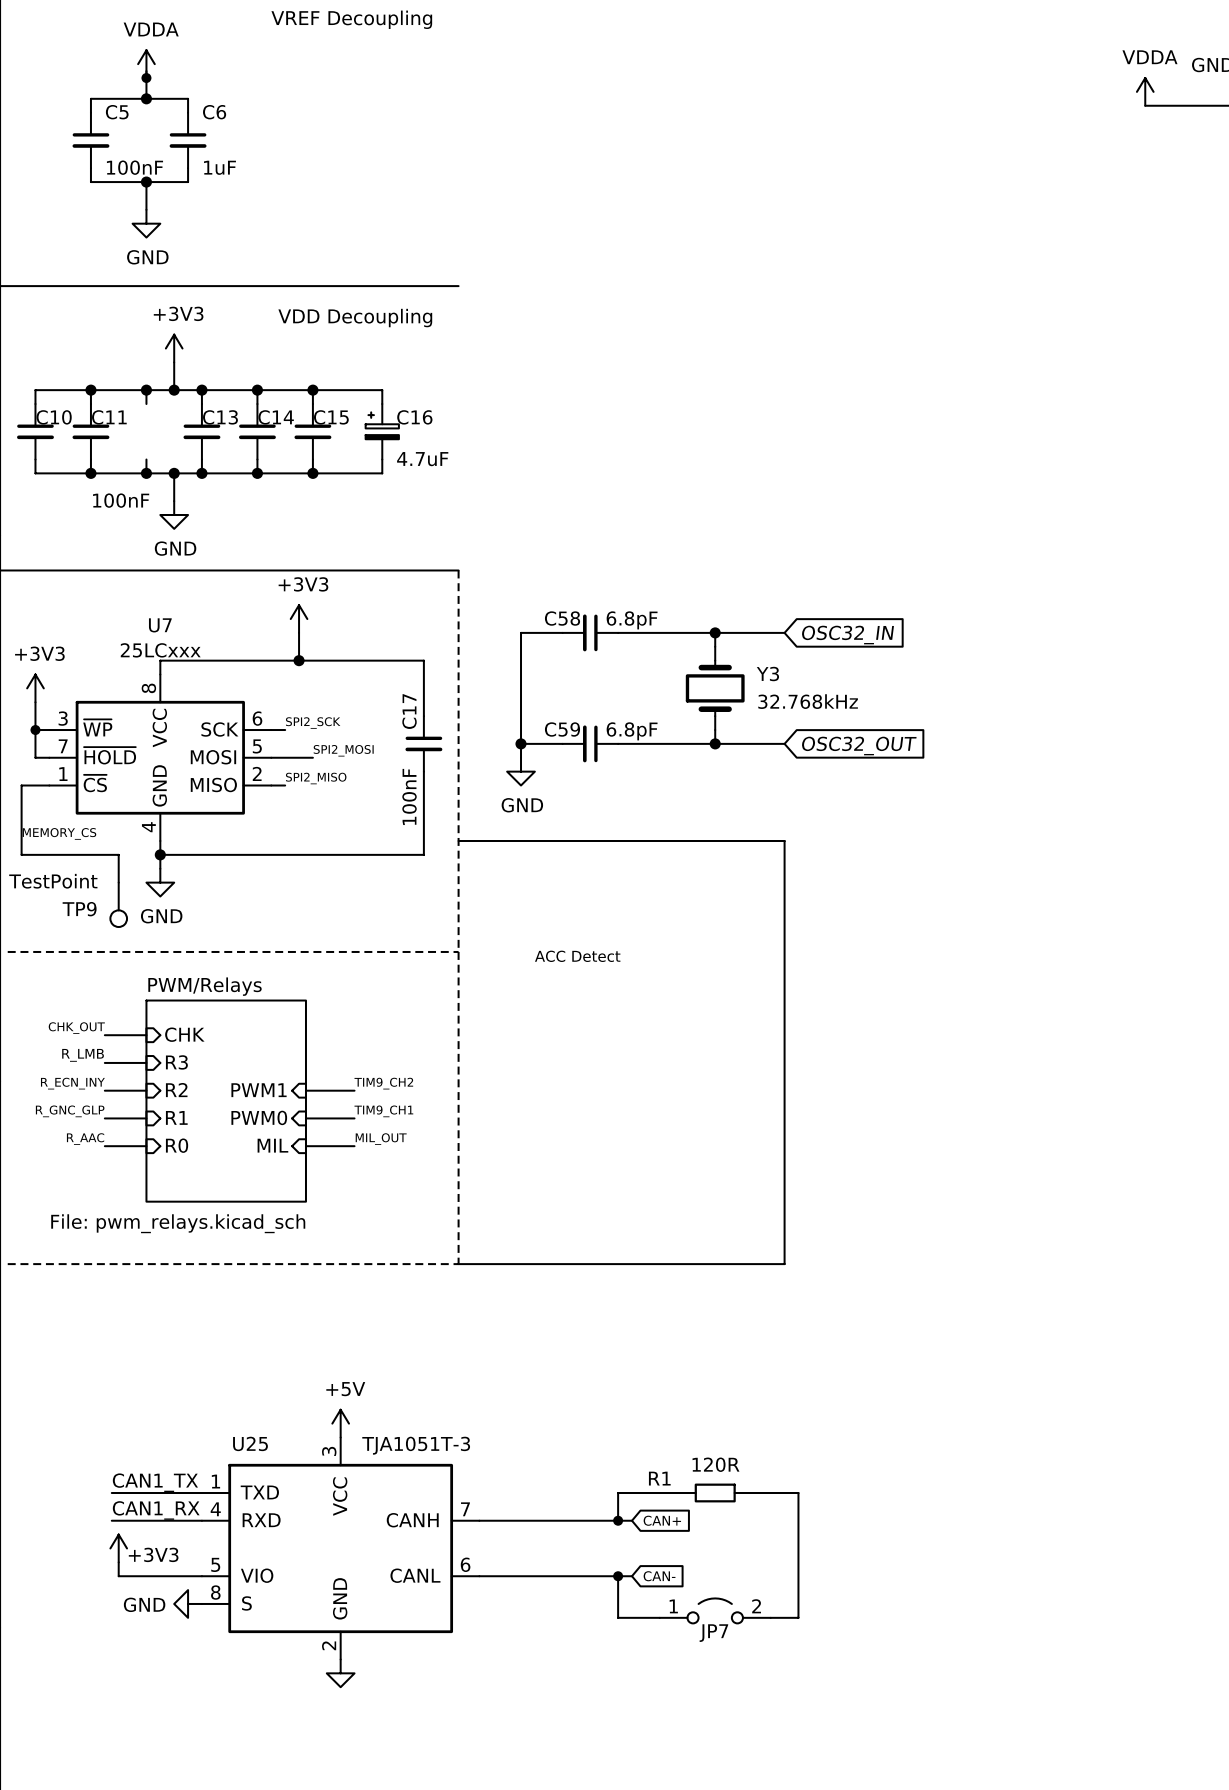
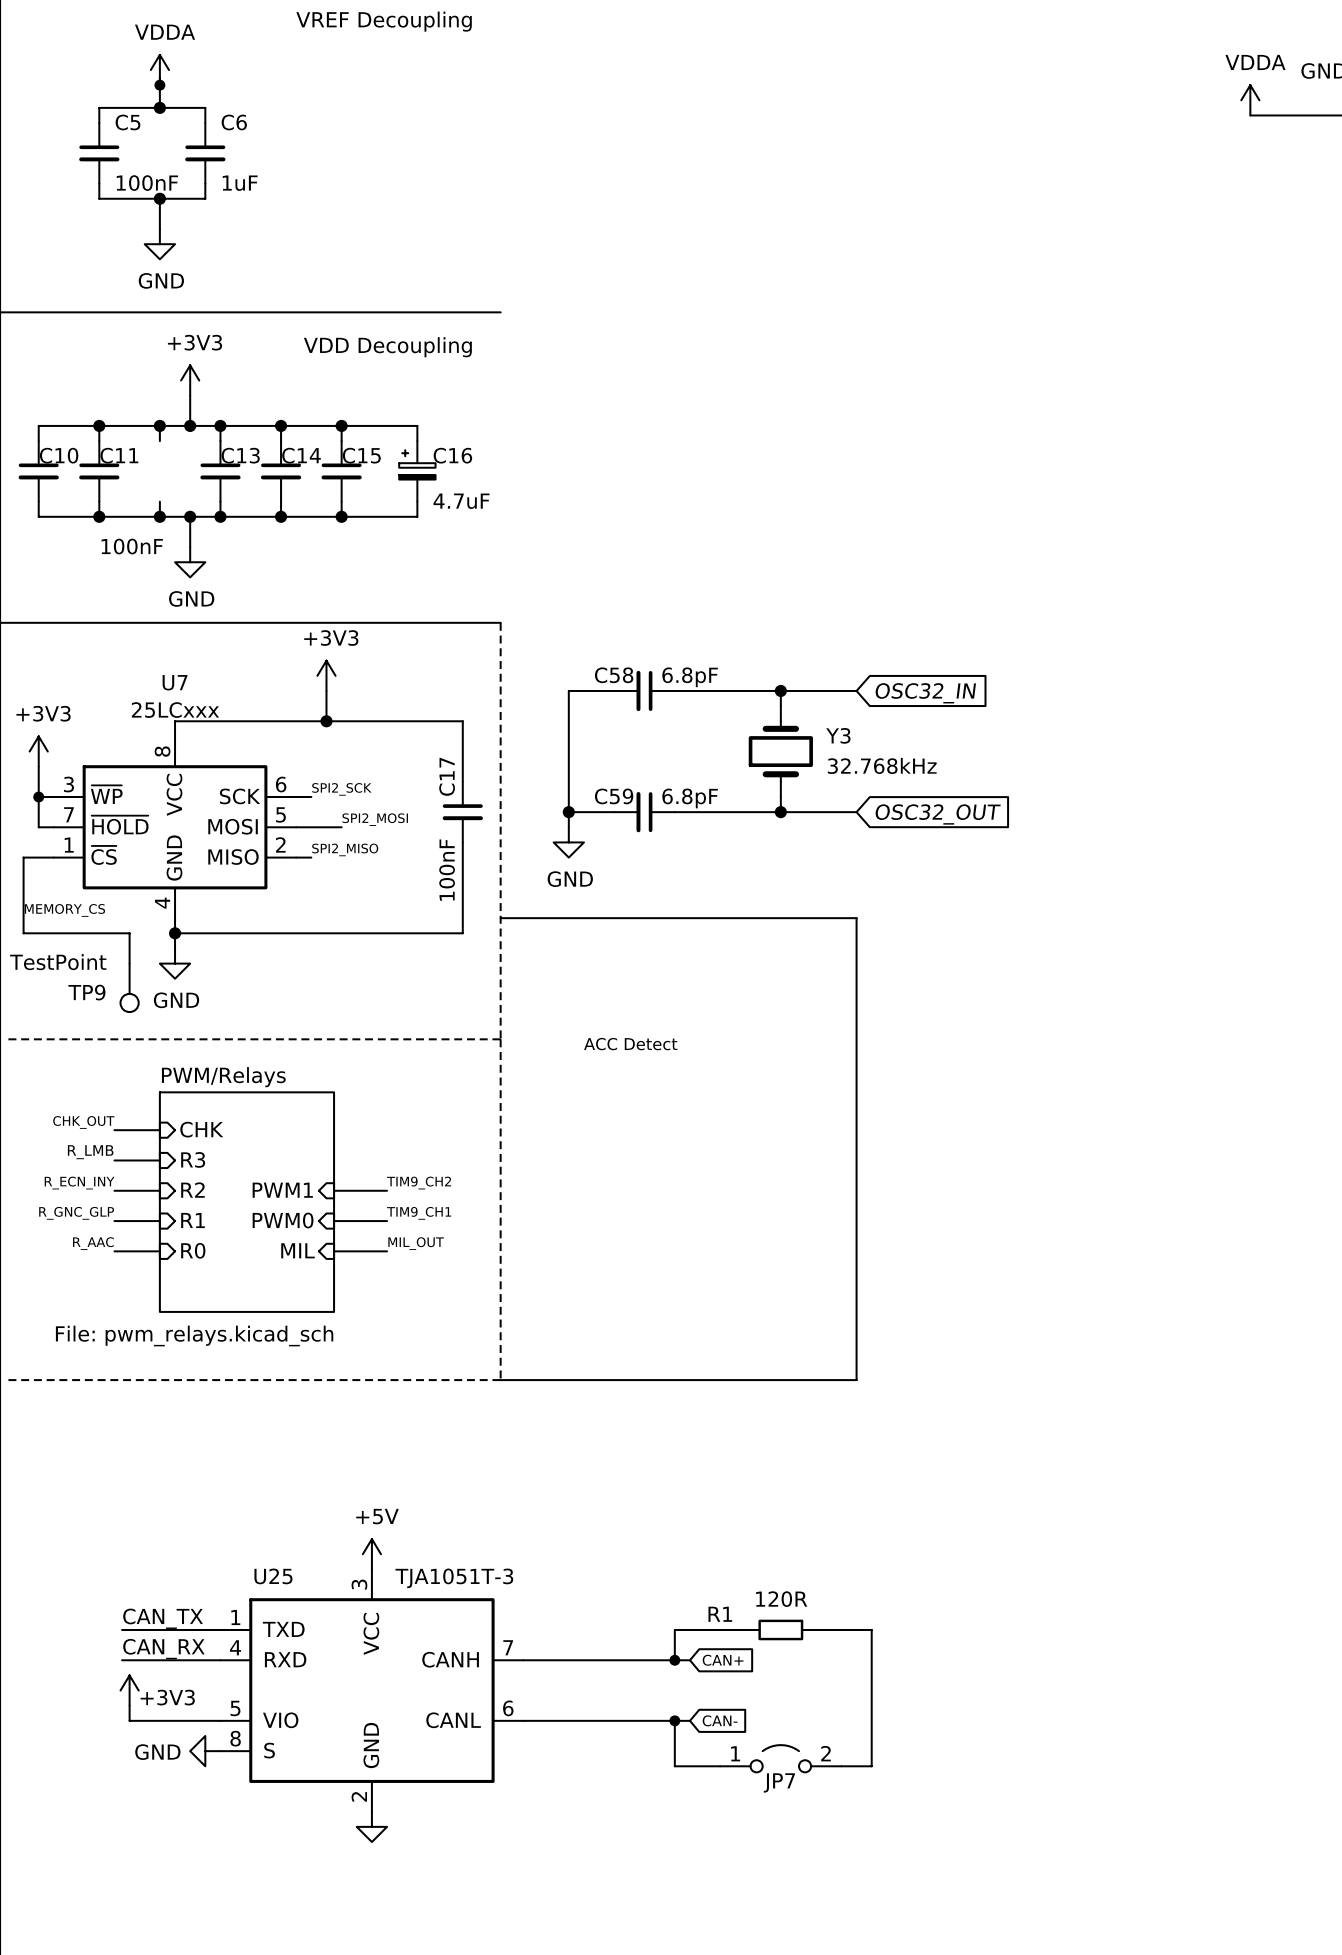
label: CAN1_TX (155, 1482) -> CAN_TX (163, 1618)
label: CAN1_RX (156, 1510) -> CAN_RX (163, 1649)

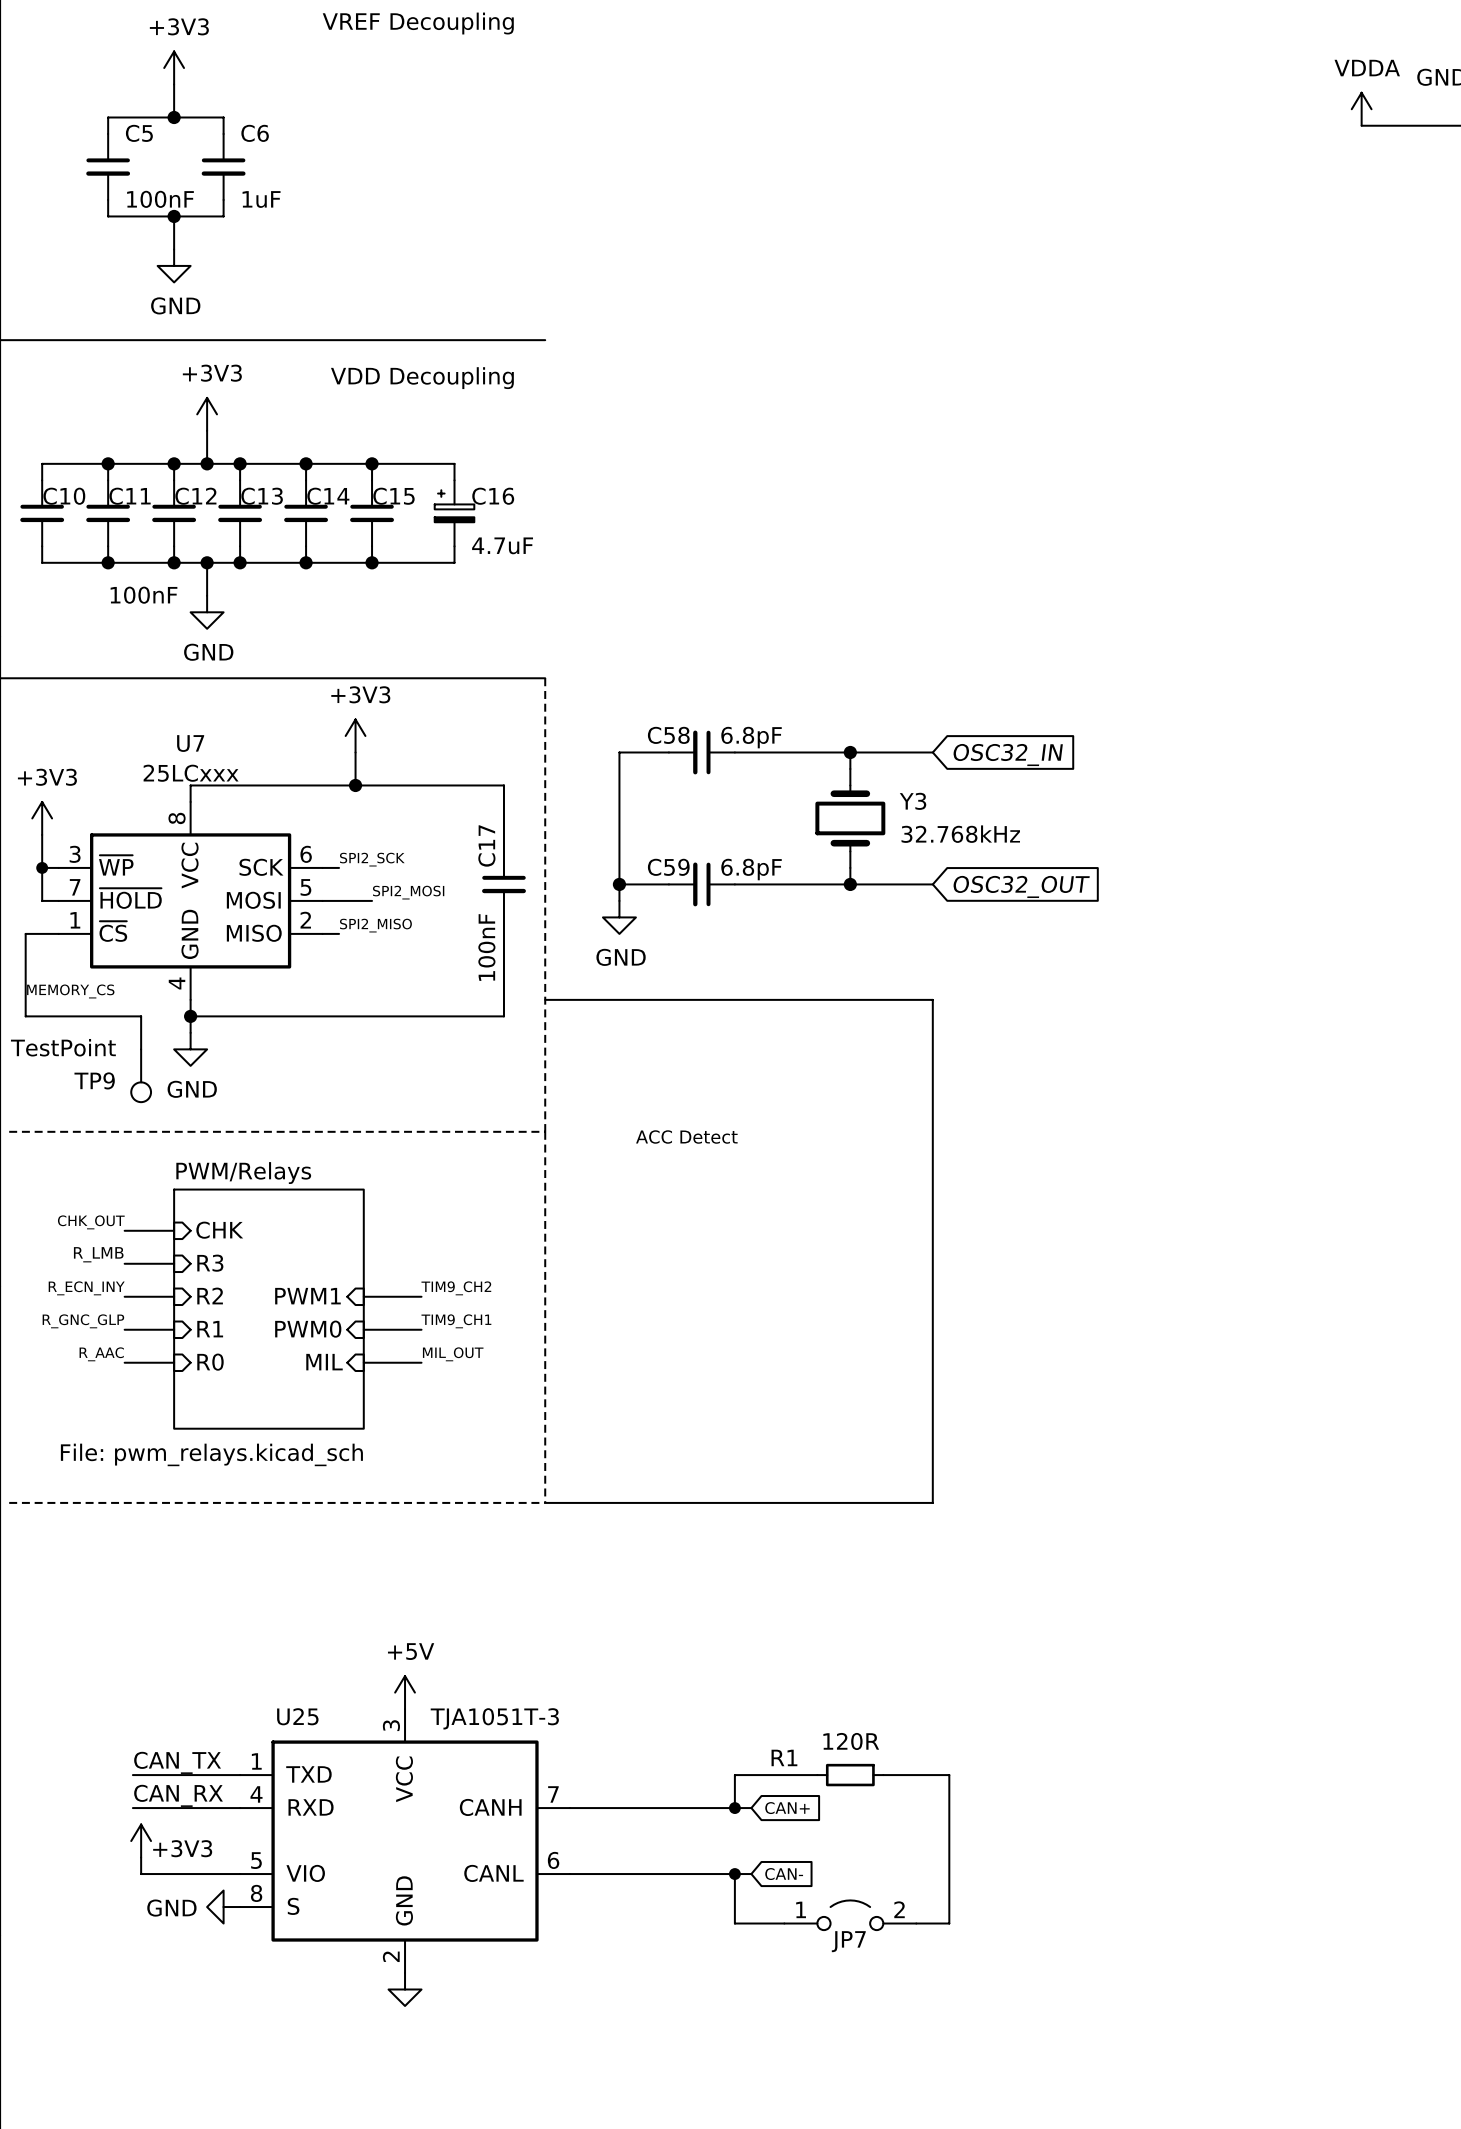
power symbol: VDDA (159, 70) -> +3V3 (174, 68)
junction: (159, 85) -> none
C12: none -> (174, 513)

